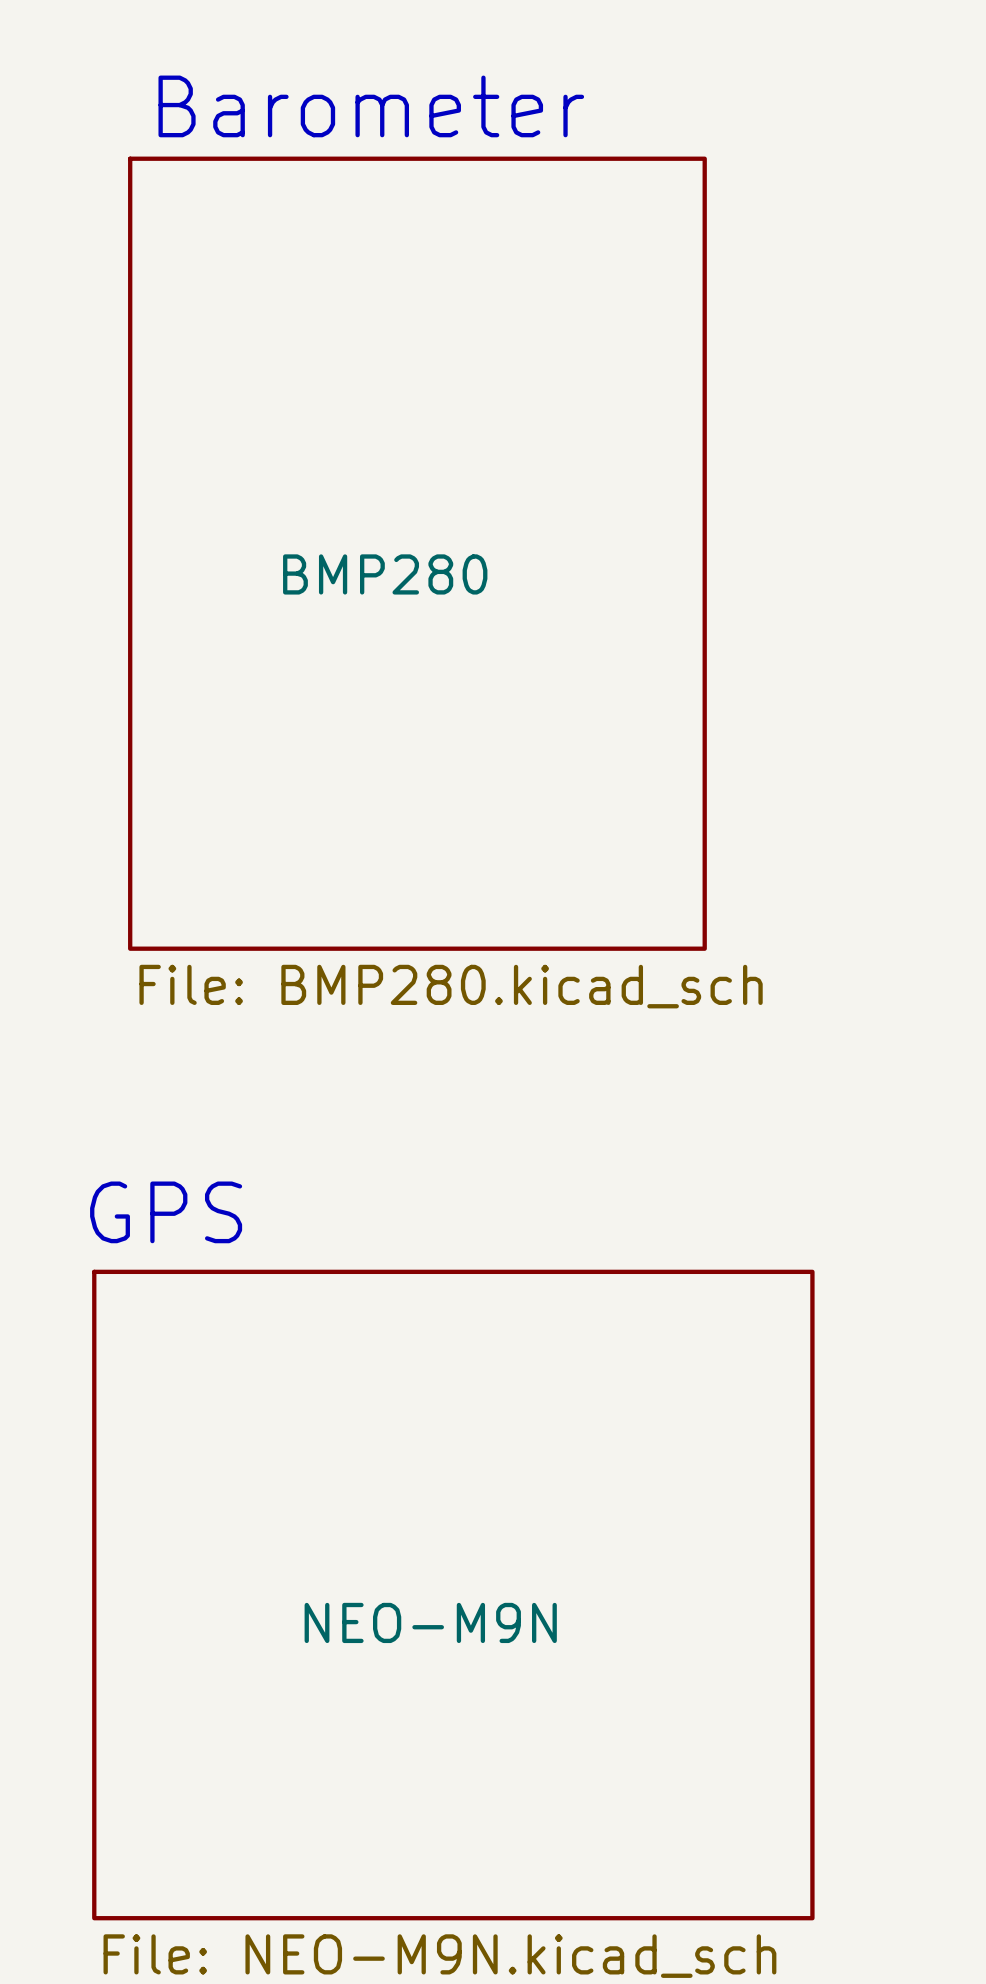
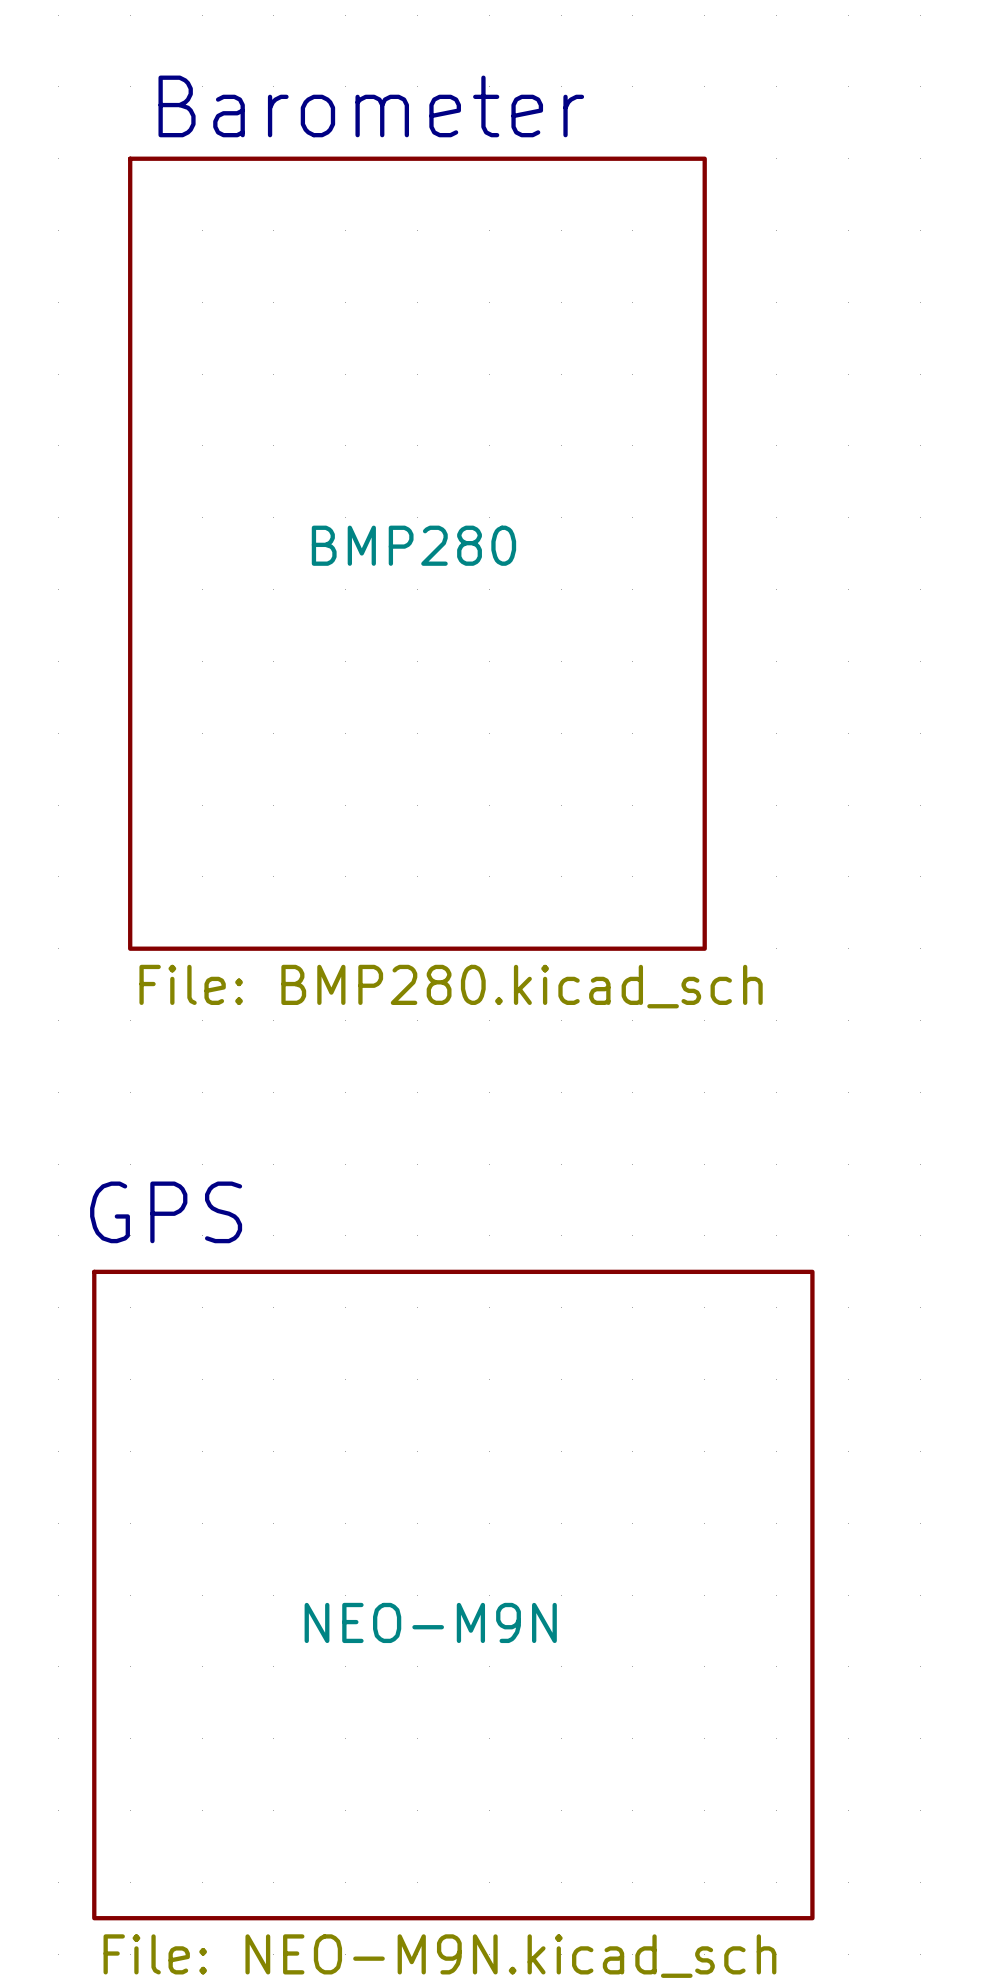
sheet BMP280 name position: BMP280 (385, 574) -> BMP280 (413, 545)

